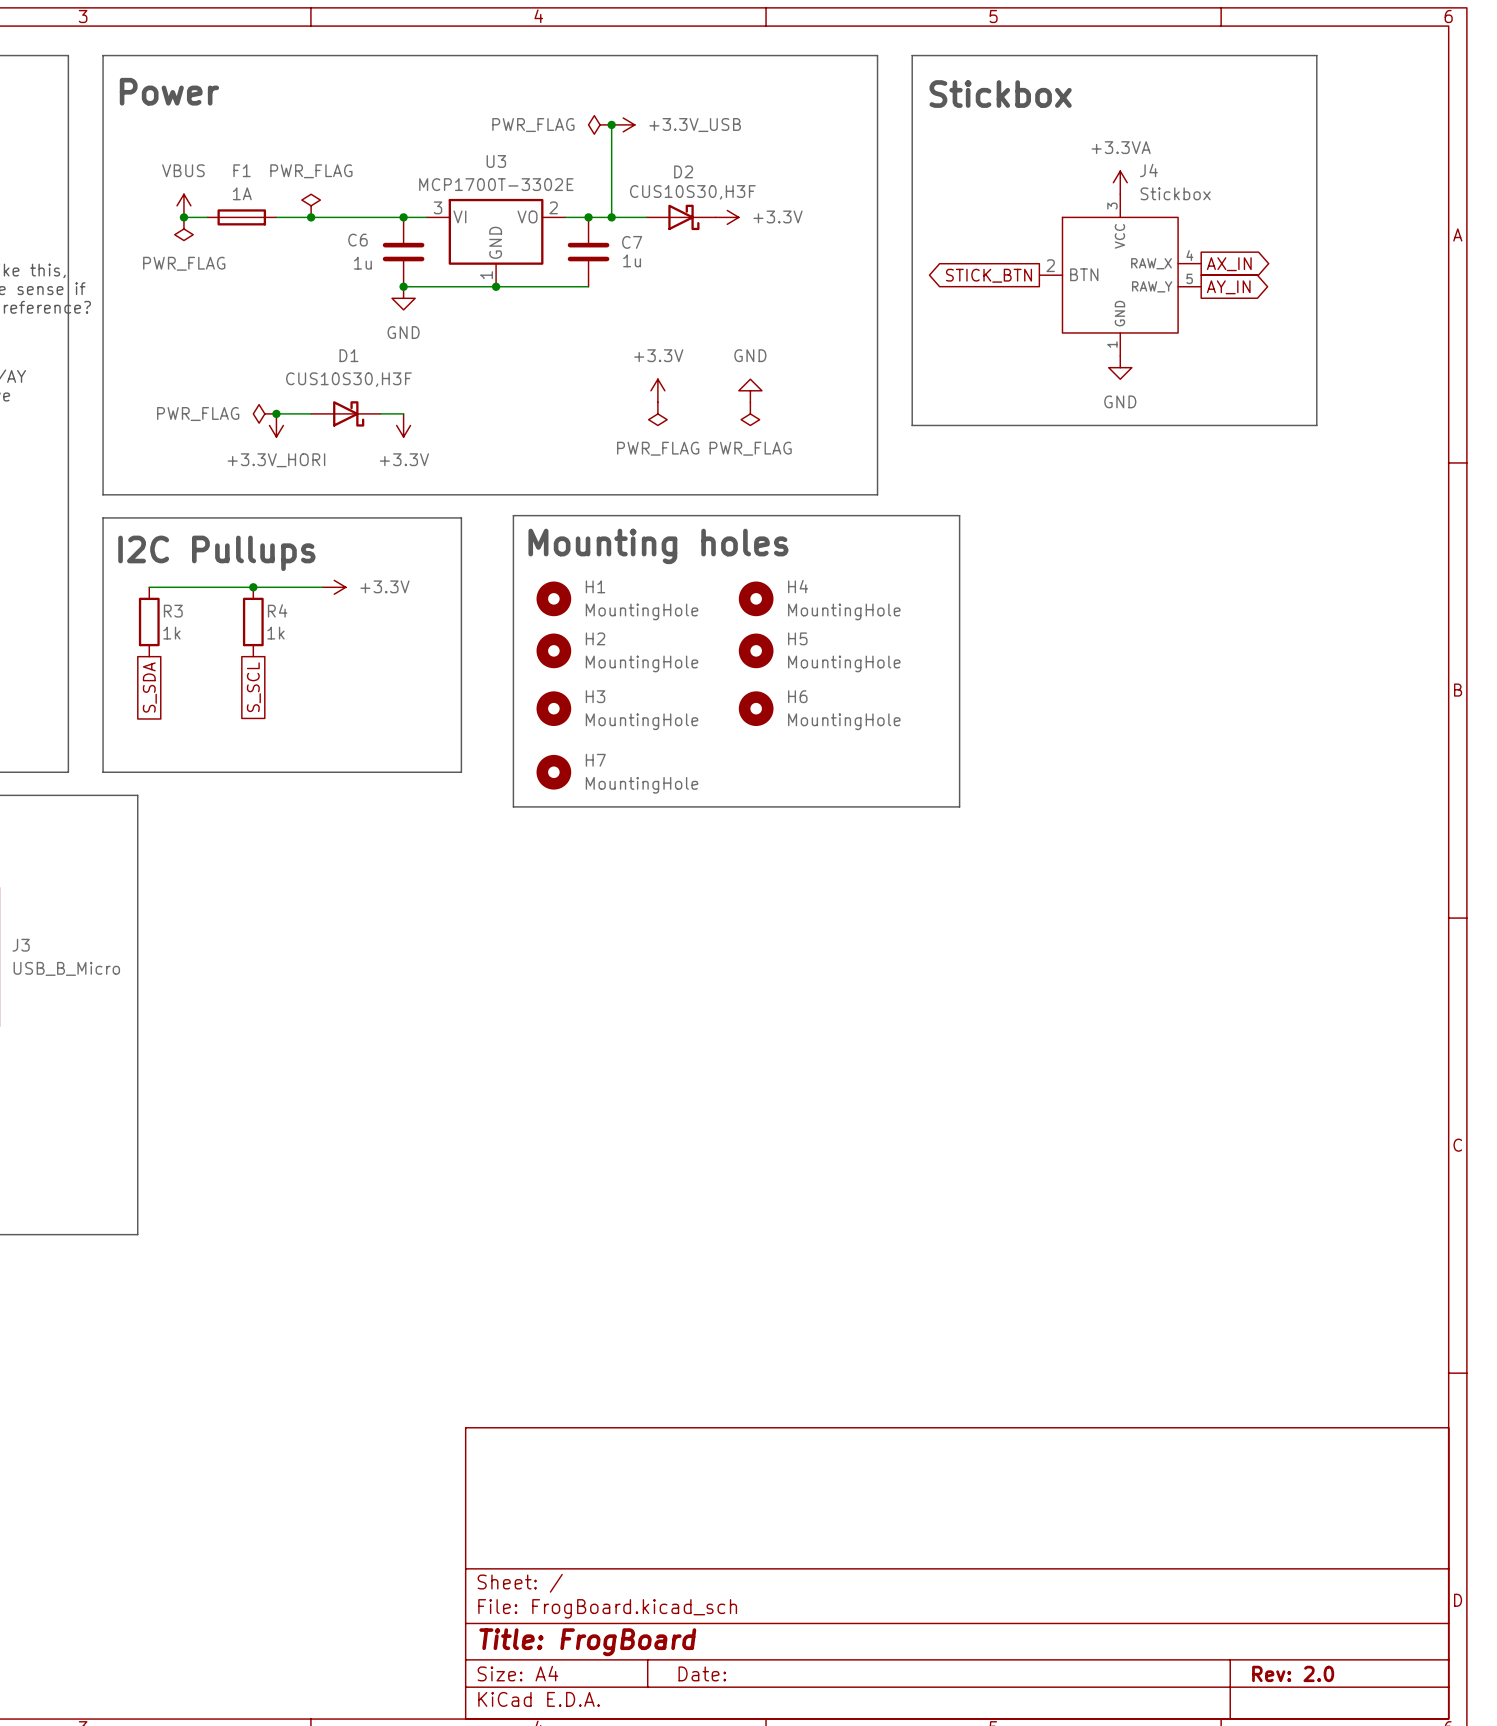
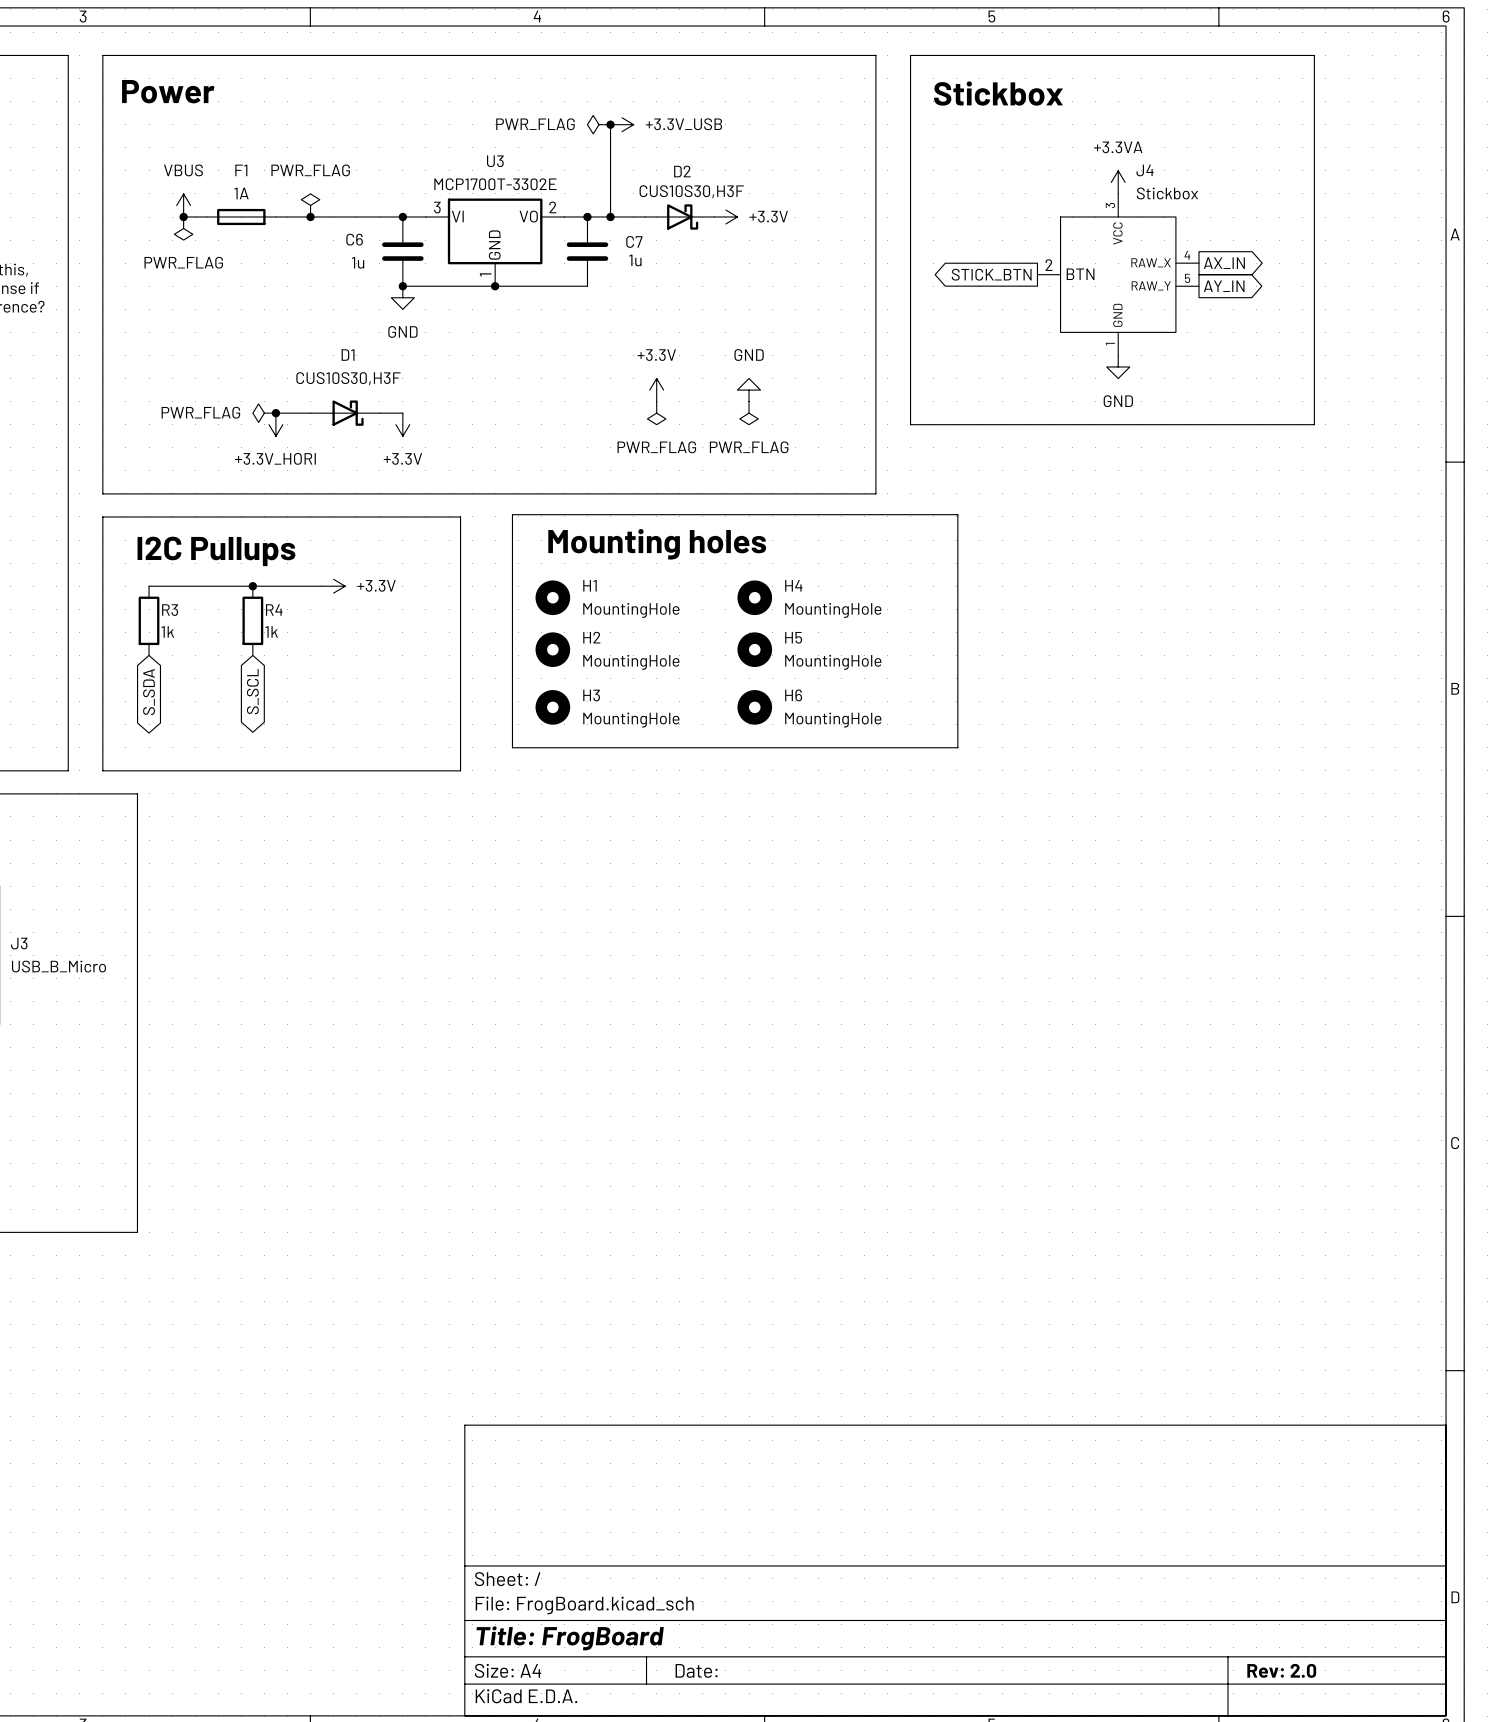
global label shape: passive (149, 687) -> bidirectional (149, 692)
global label shape: passive (253, 687) -> bidirectional (252, 691)
line: (513, 749) (513, 806) (959, 806) (959, 749) -> (512, 747) (957, 747)
H7: MountingHole (553, 772) -> none

